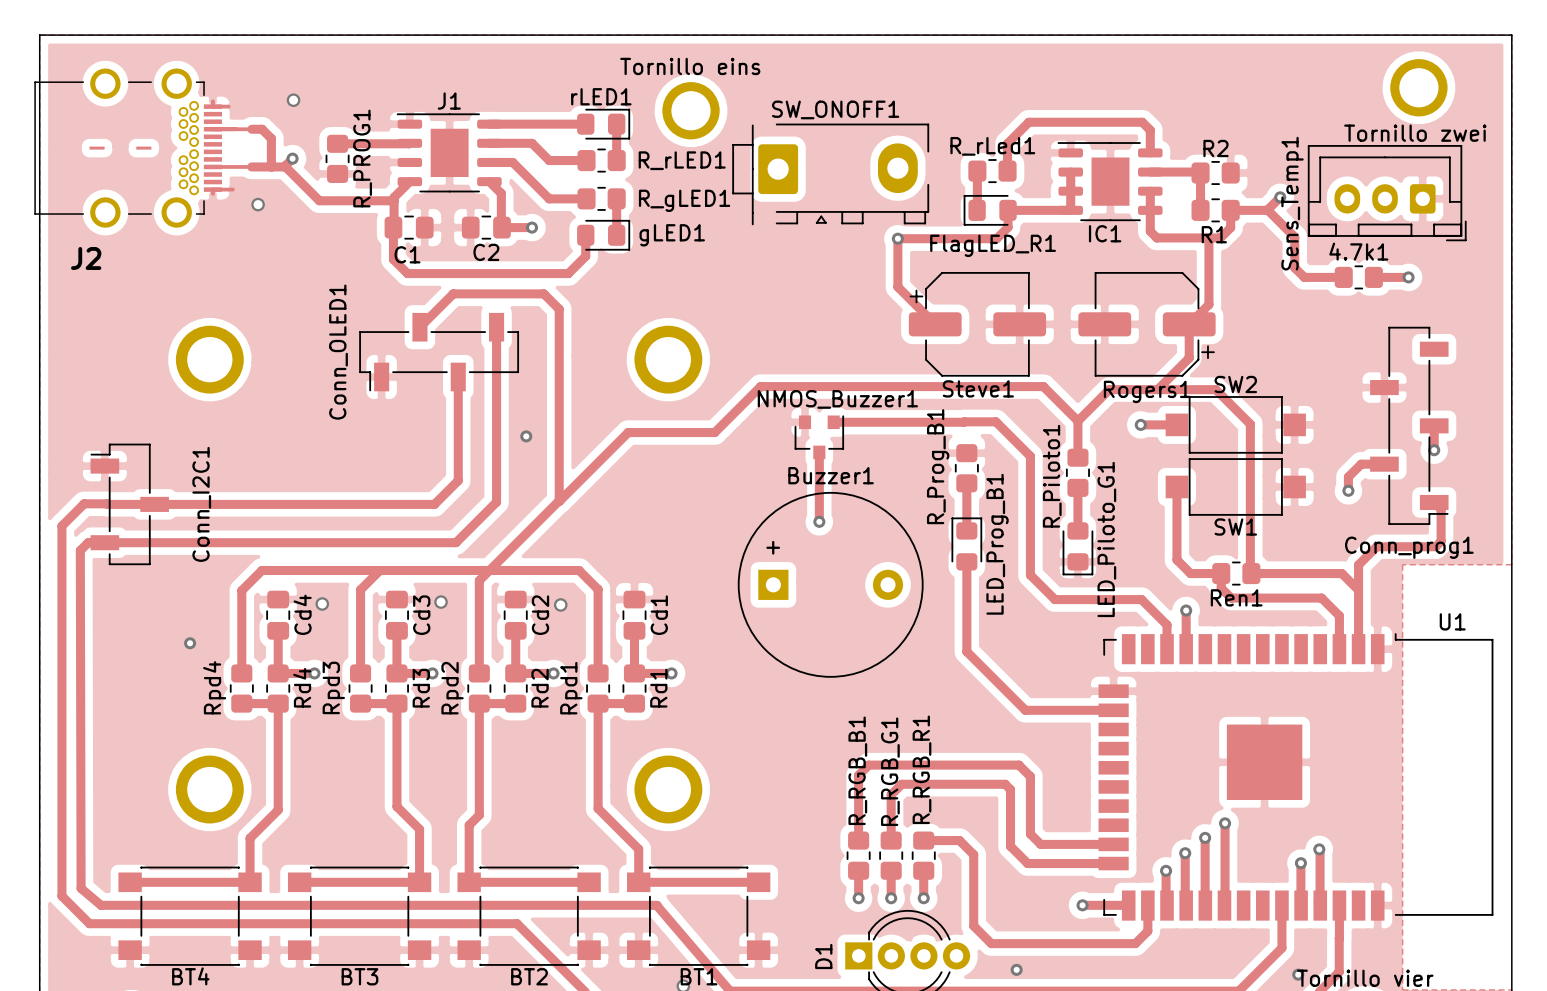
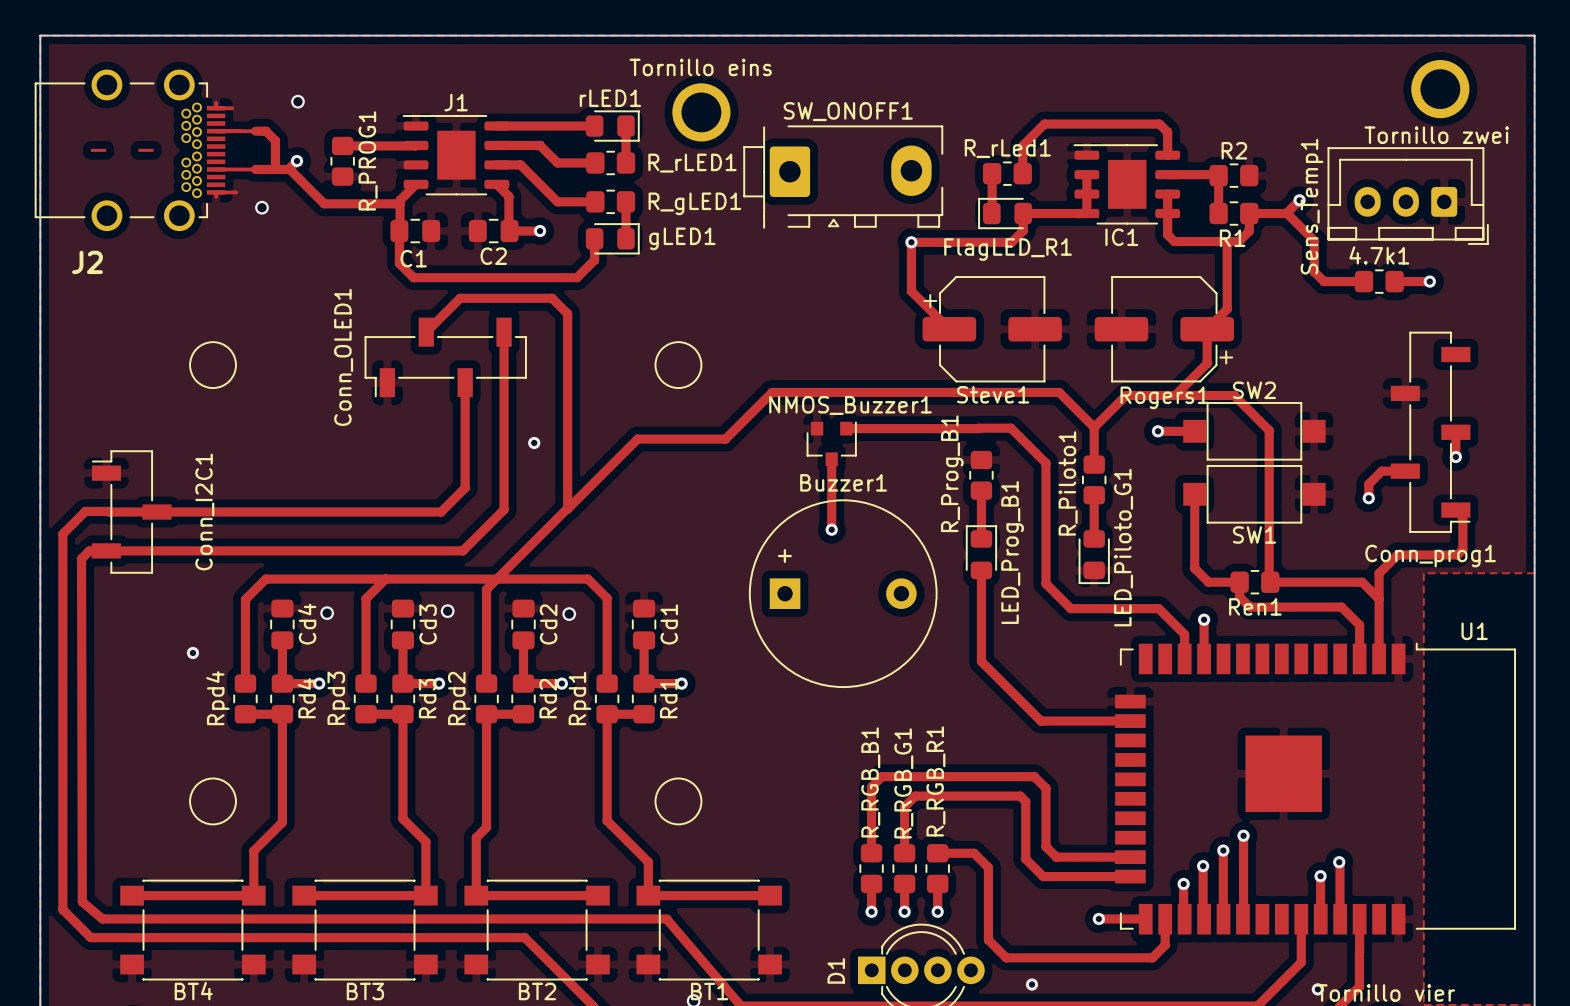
Conn_OLED1 footprint: [175, 312, 703, 824] -> [189, 317, 703, 826]

